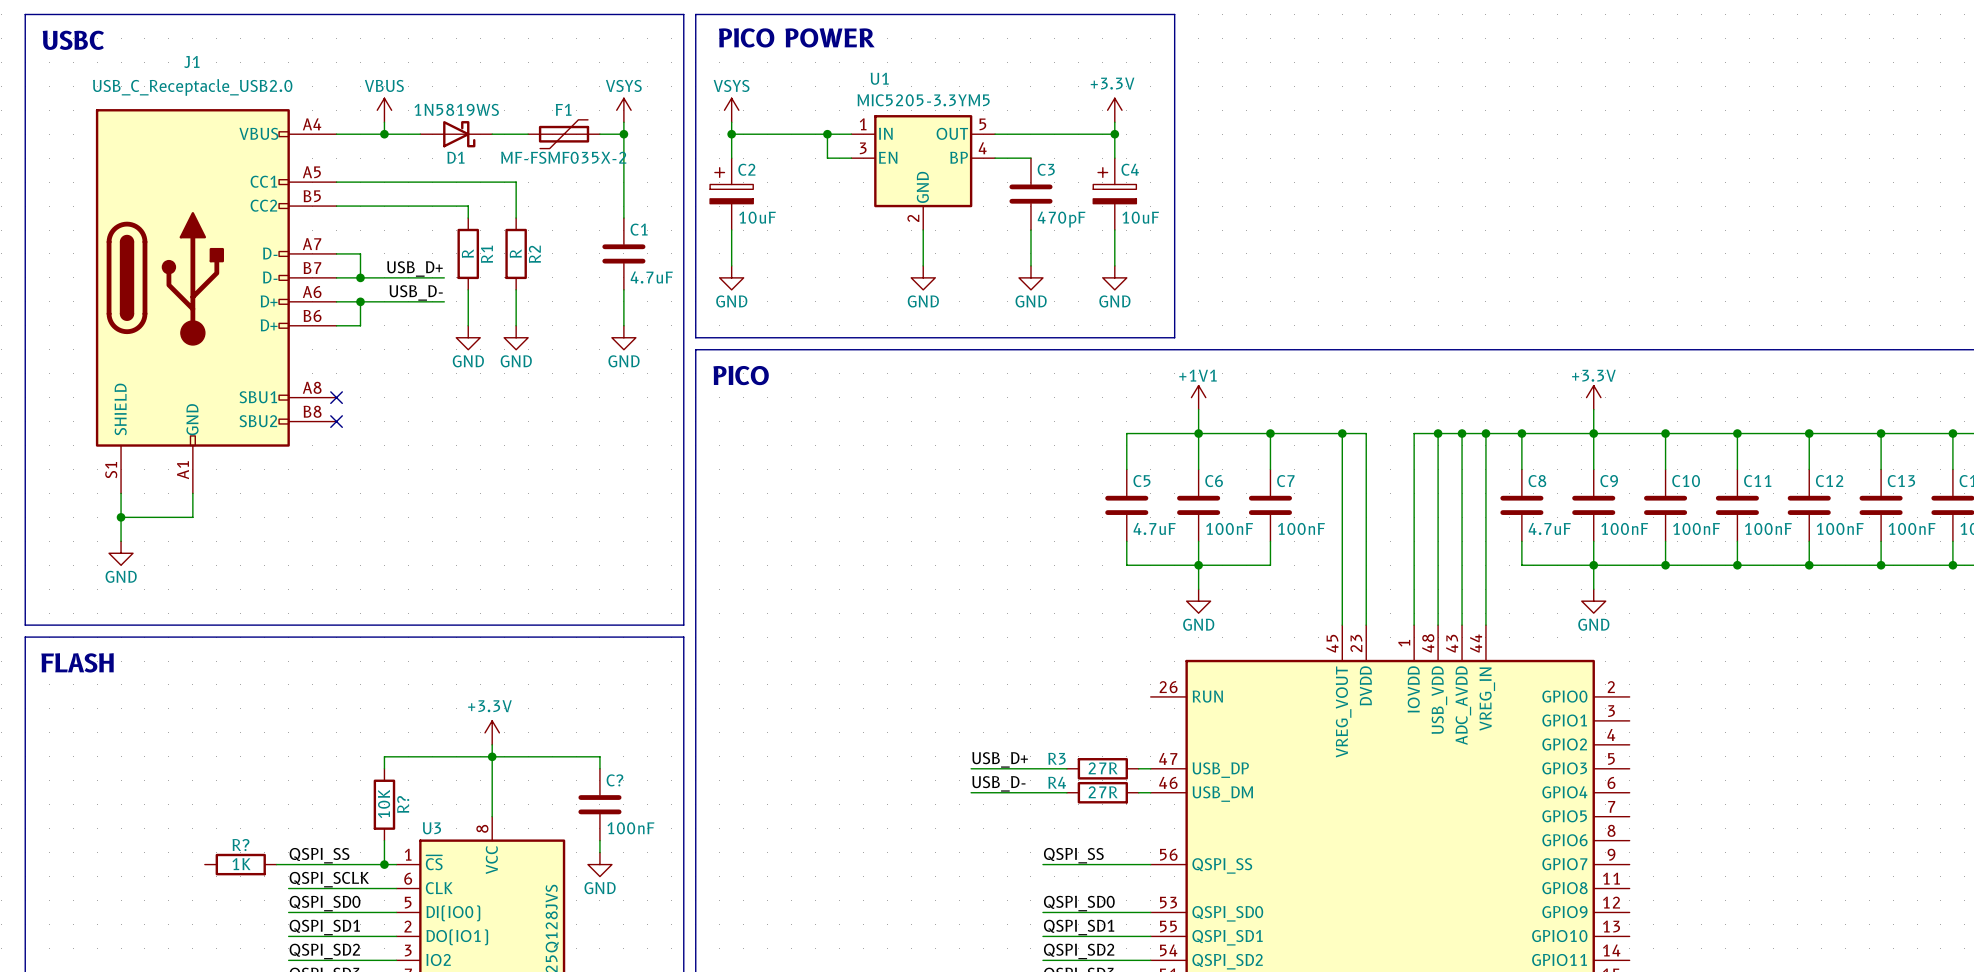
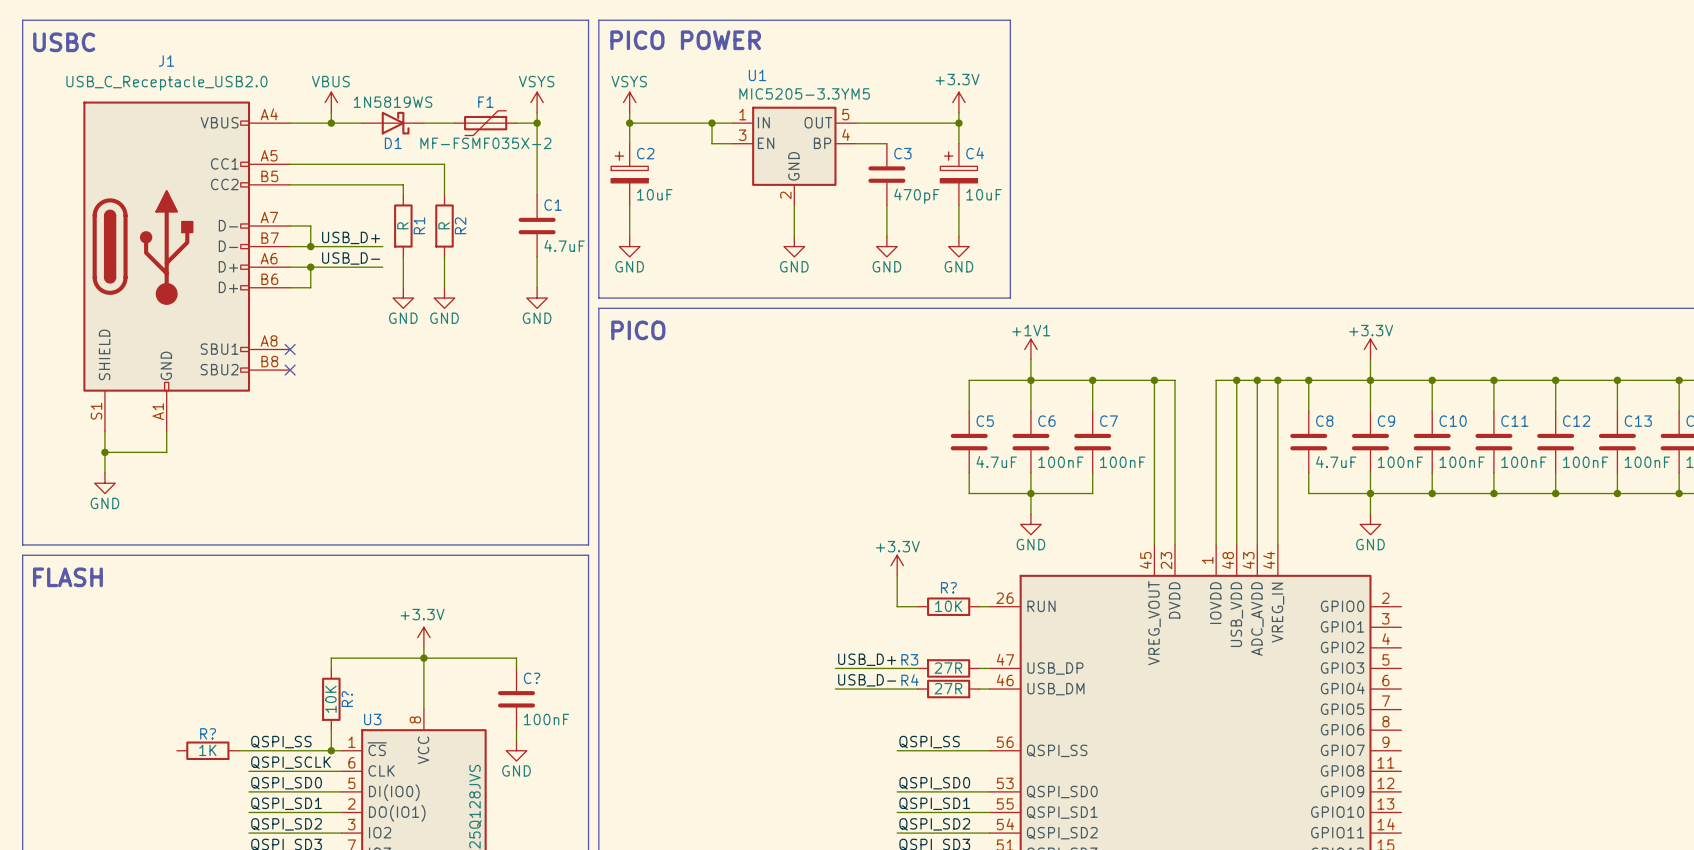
power symbol: none -> +3.3V (897, 565)
wire: none -> (897, 575) (897, 606) (917, 606)
R?: none -> 10K (948, 606)
wire: none -> (979, 606) (989, 606)

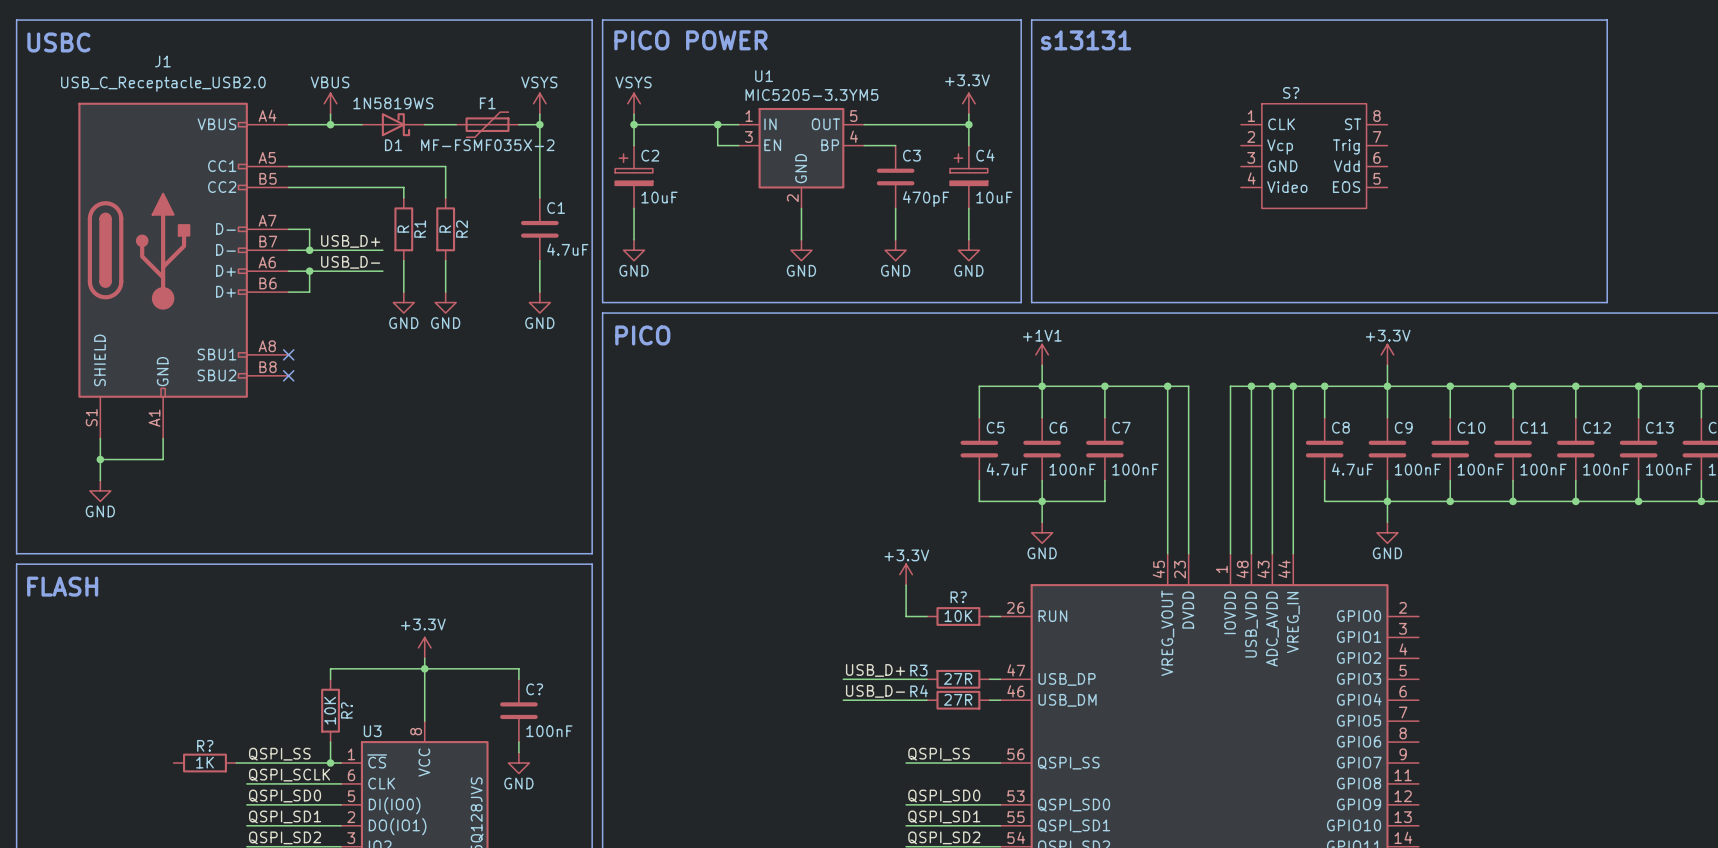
line: none -> (1031, 20) (1607, 20) (1607, 302) (1031, 302) (1031, 20)
text: none -> s13131 (1086, 40)
S?: none -> (1314, 156)

